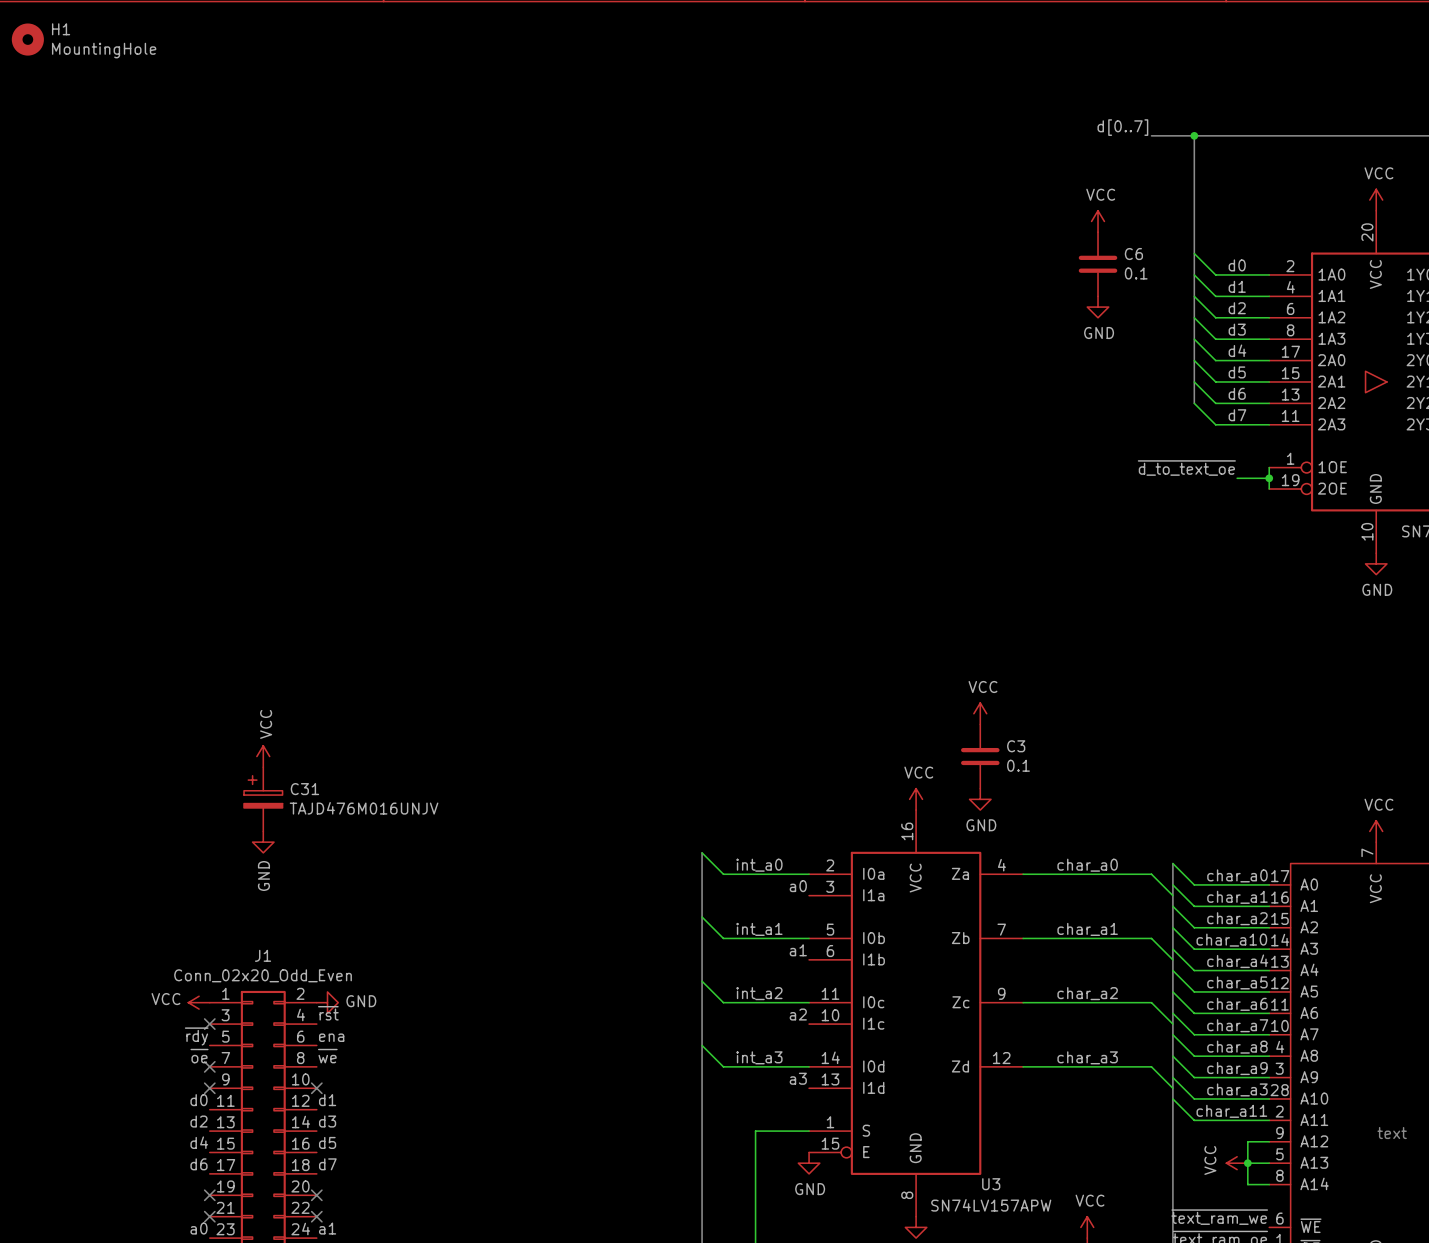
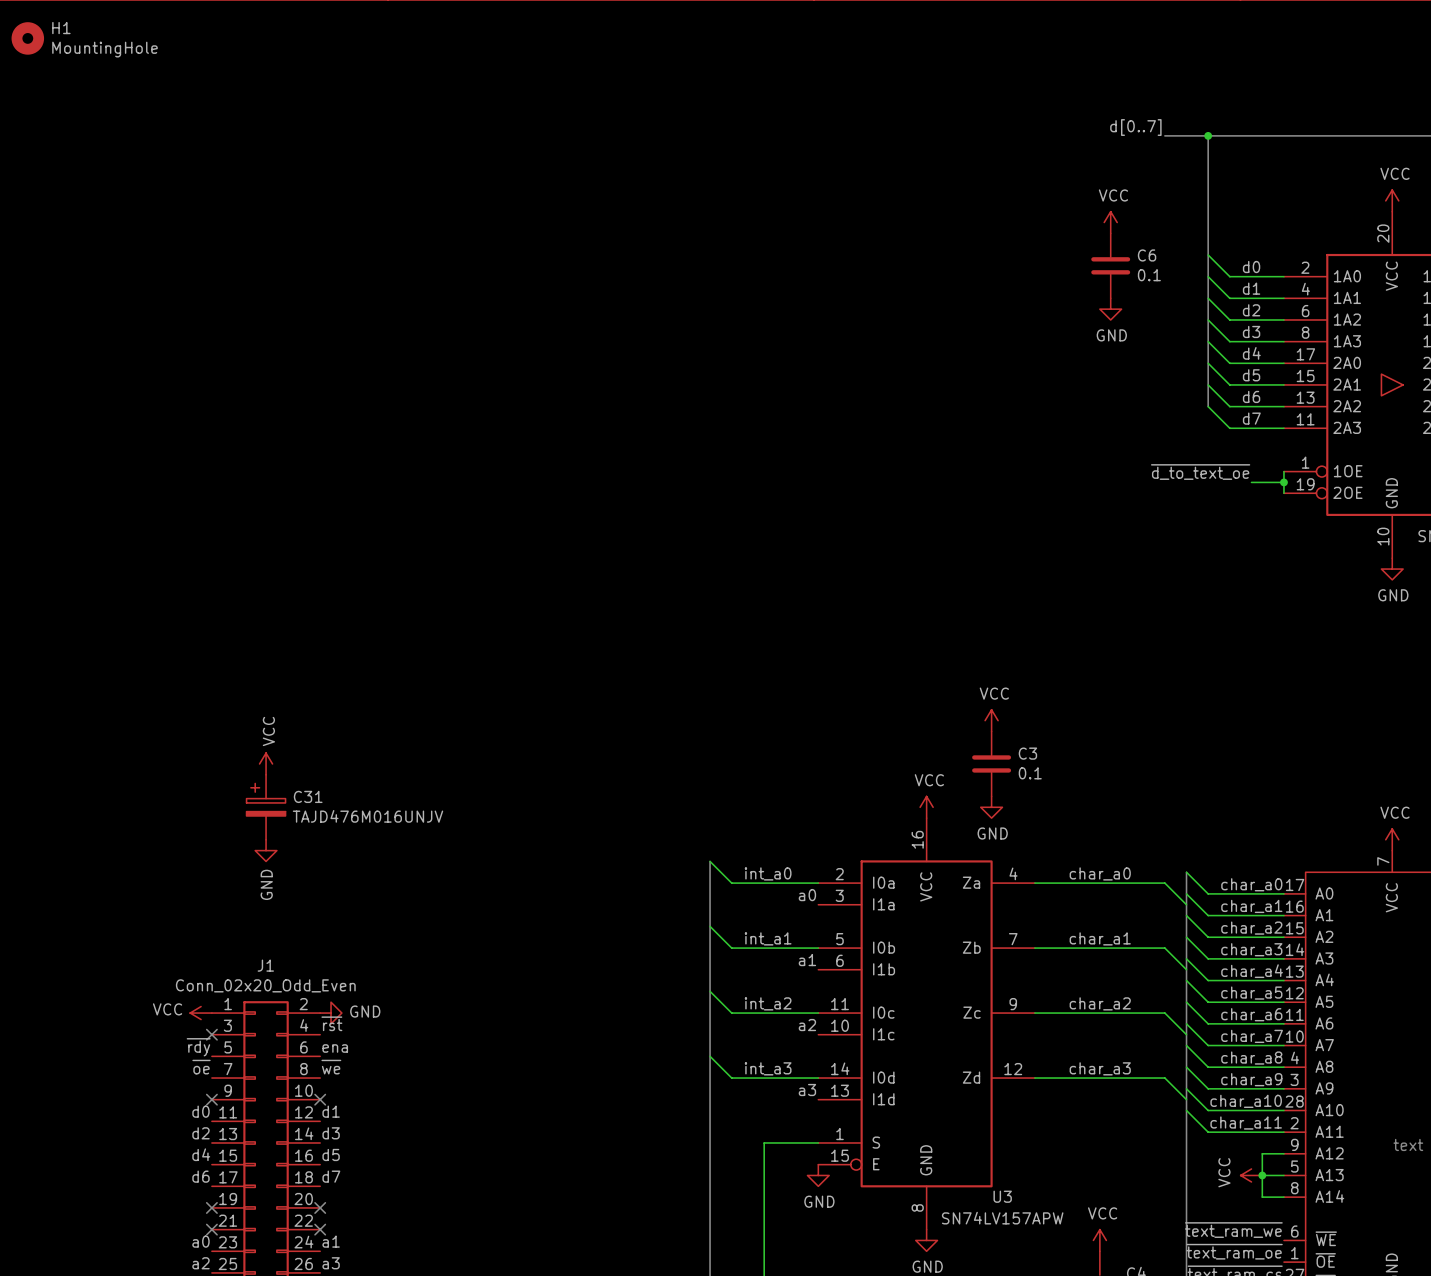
label position: char_a10 (1231, 940) -> char_a10 (1246, 1101)
no-connect mark: (209, 1066) -> none
label position: char_a3 (1237, 1089) -> char_a3 (1251, 949)

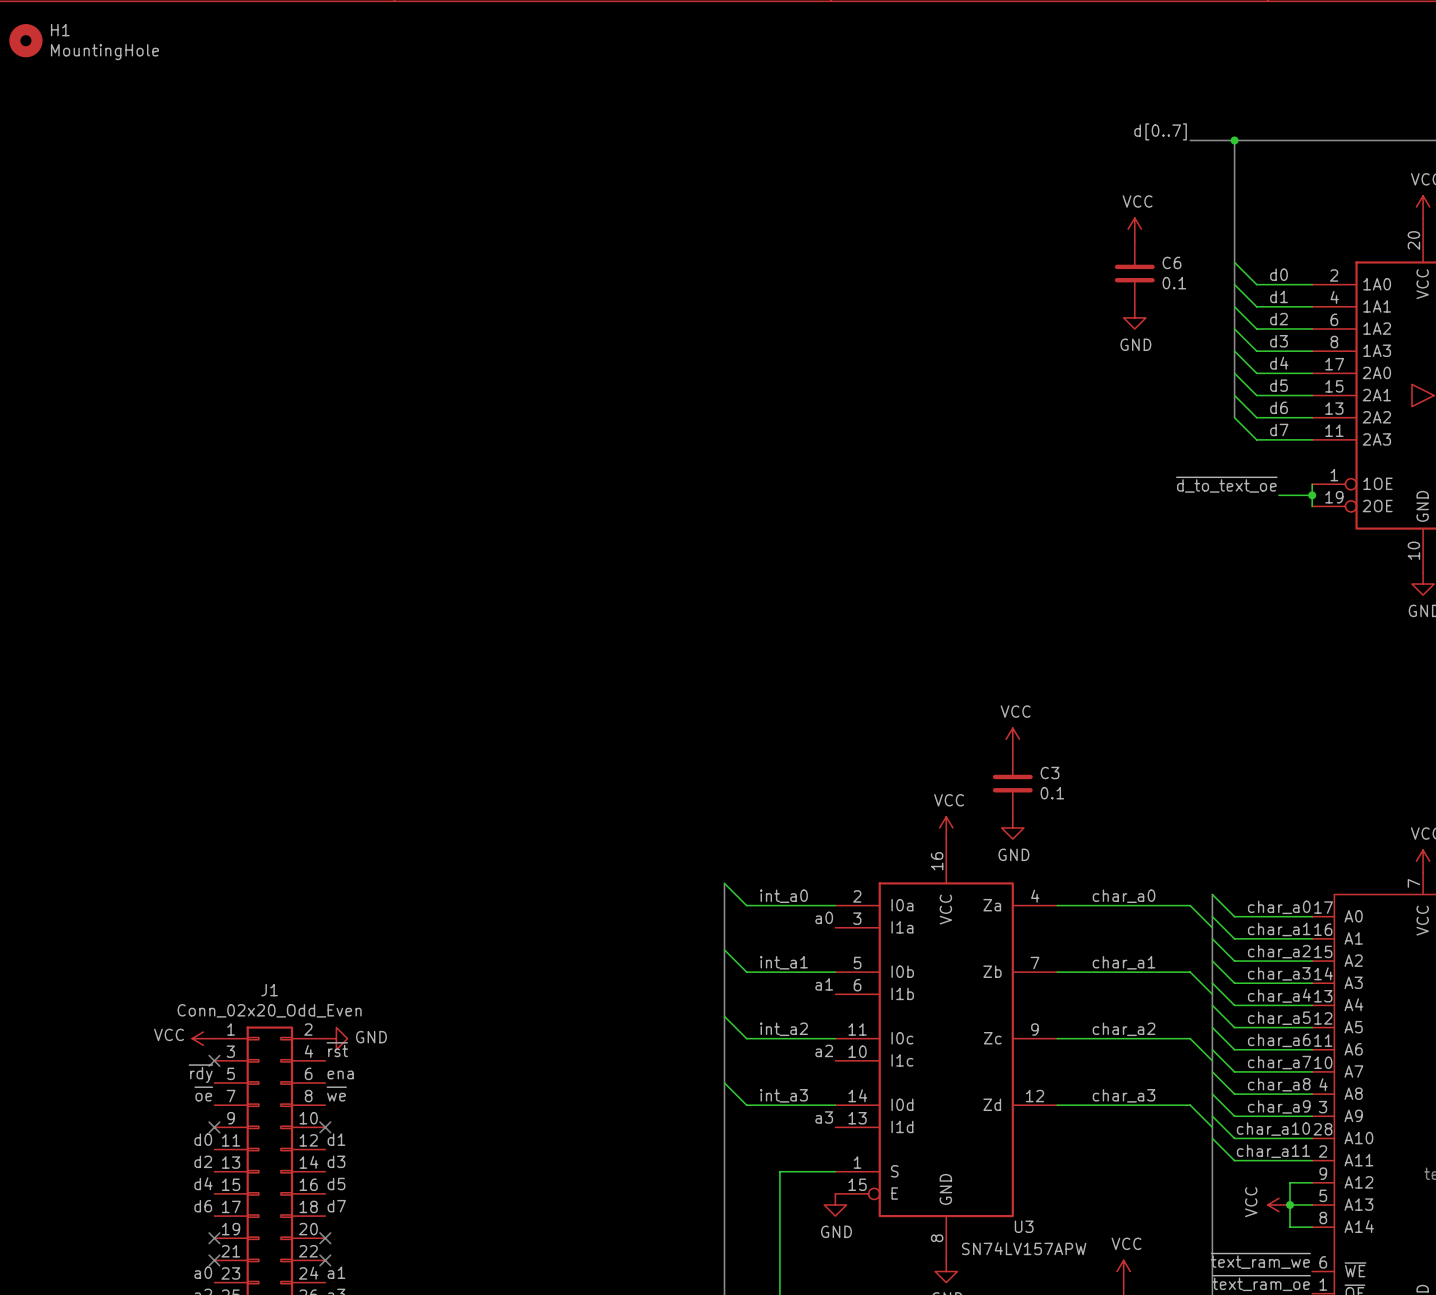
power symbol: VCC (266, 763) -> none
C31: TAJD476M016UNJV (266, 807) -> none
power symbol: GND (266, 850) -> none

